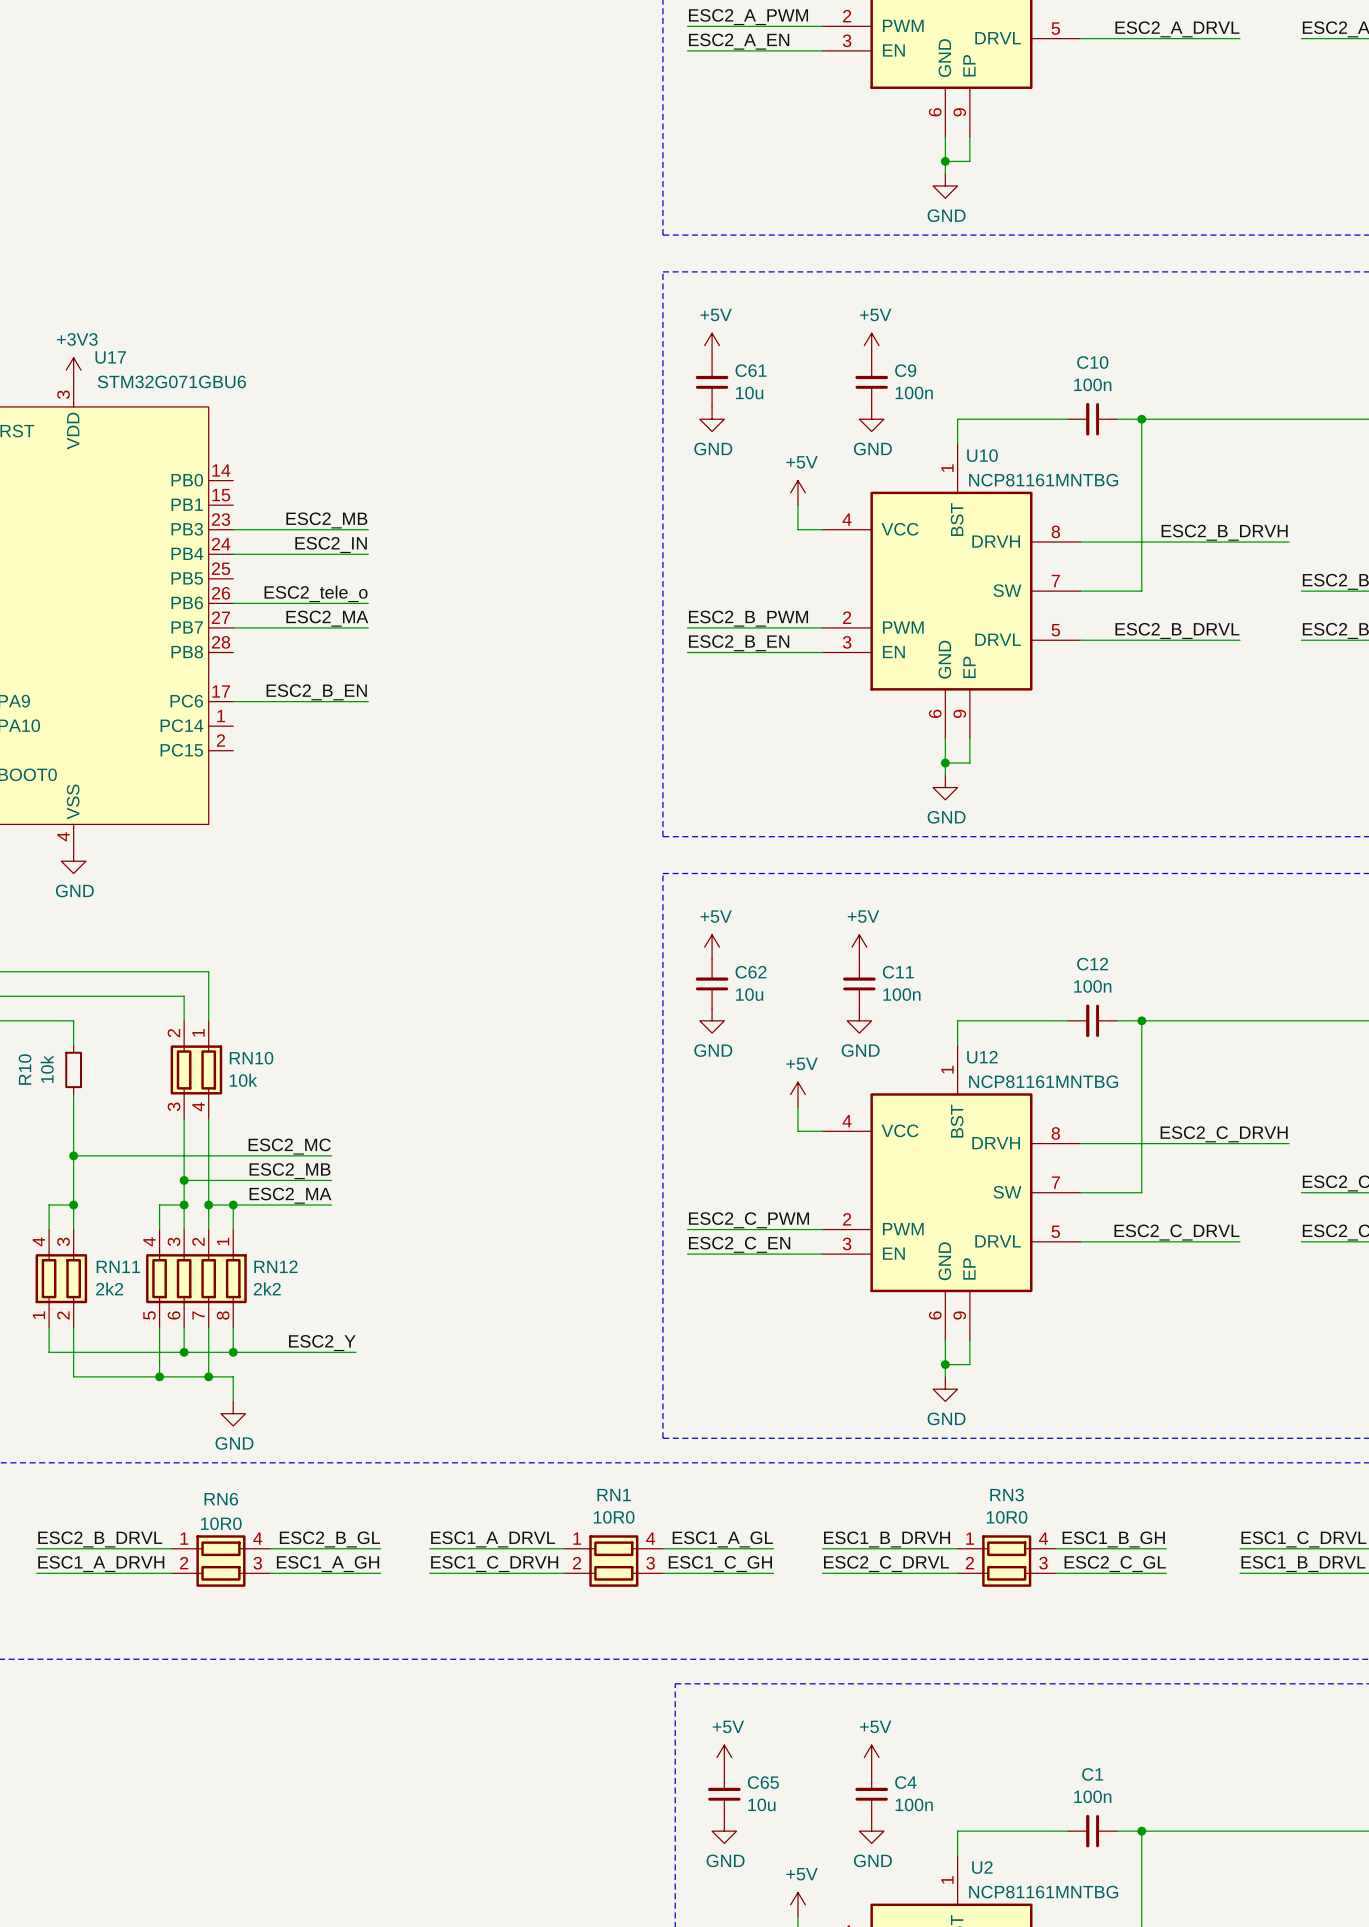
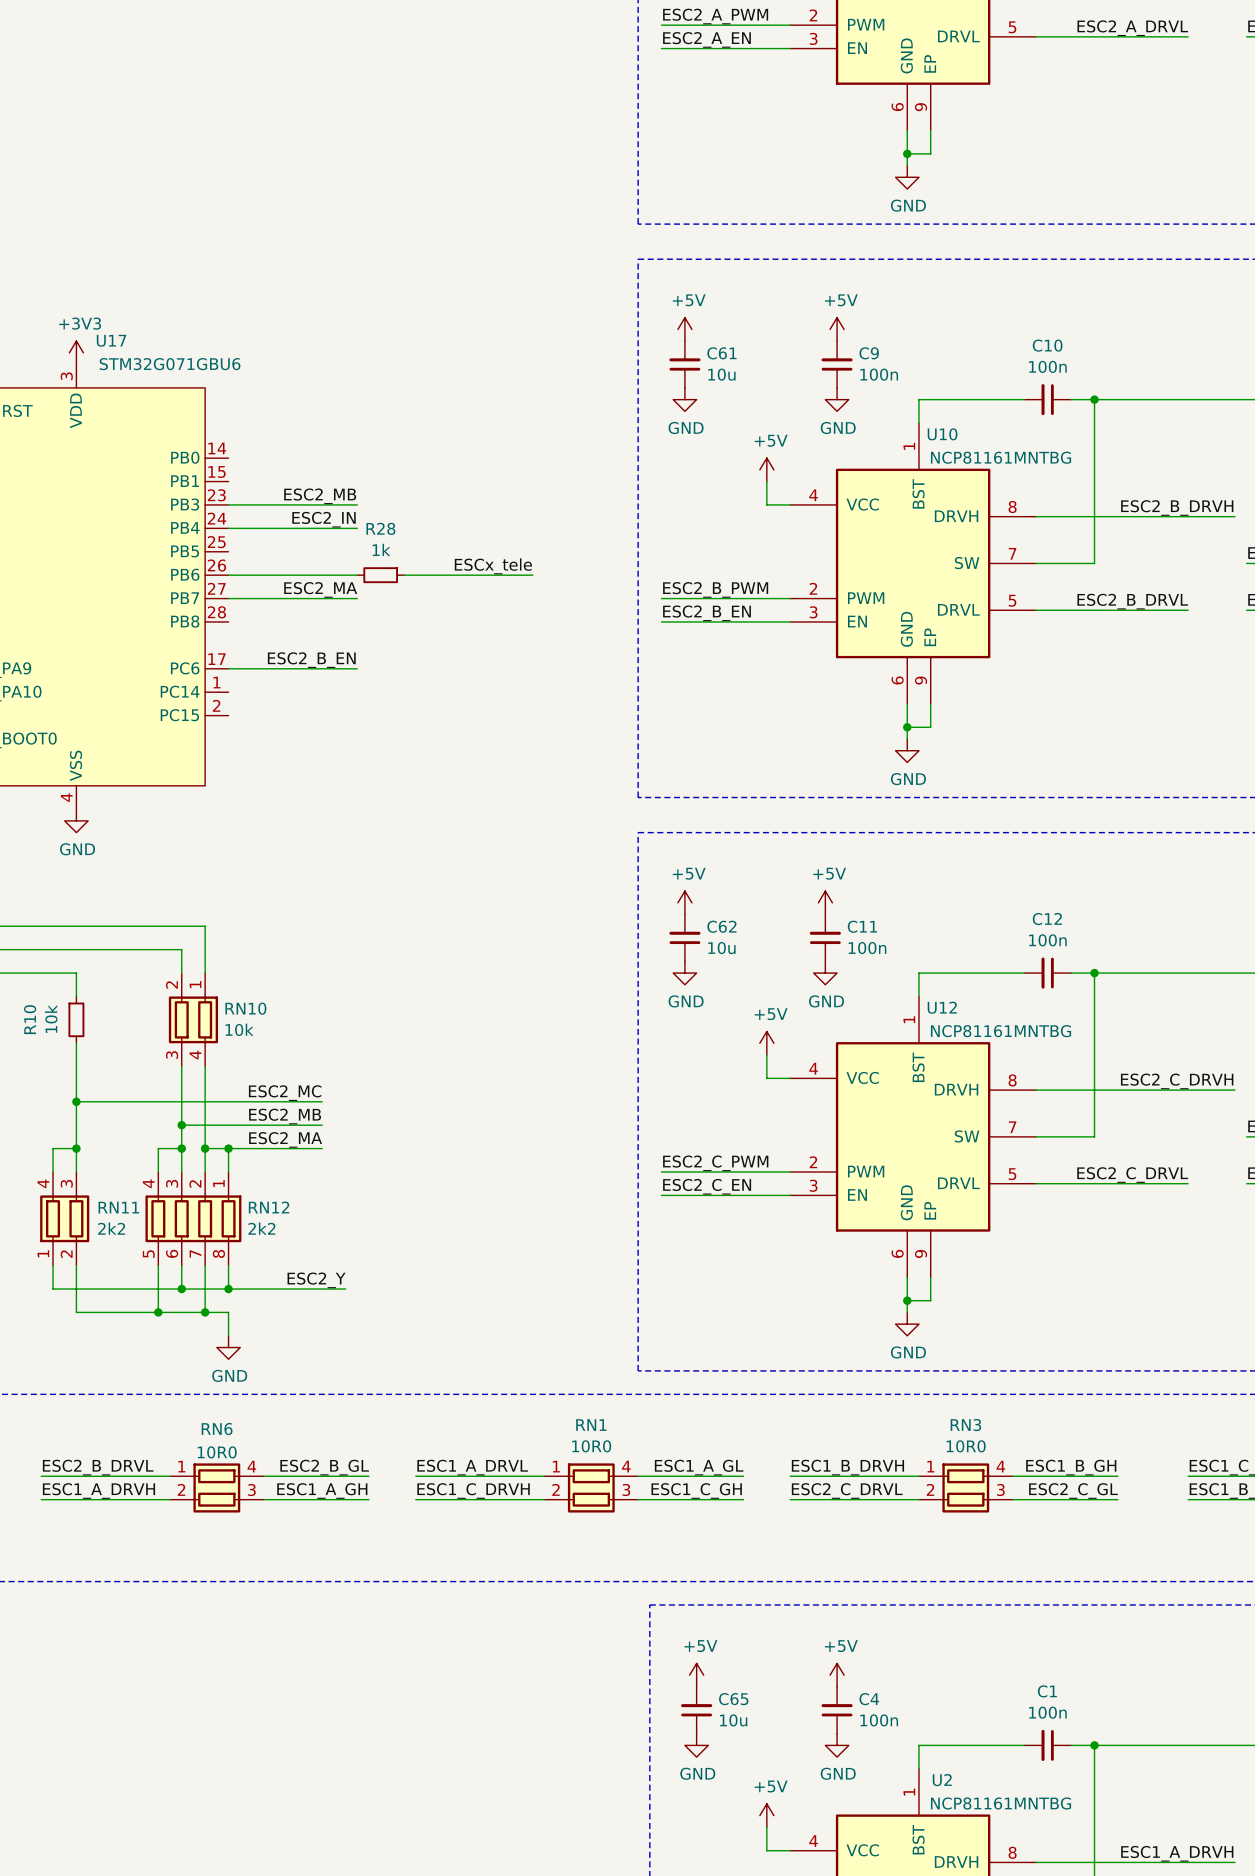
label: ESC2_tele_o (316, 593) -> none
label: none -> ESCx_tele (493, 566)
R28: none -> 1k (380, 575)
wire: none -> (404, 575) (532, 575)

